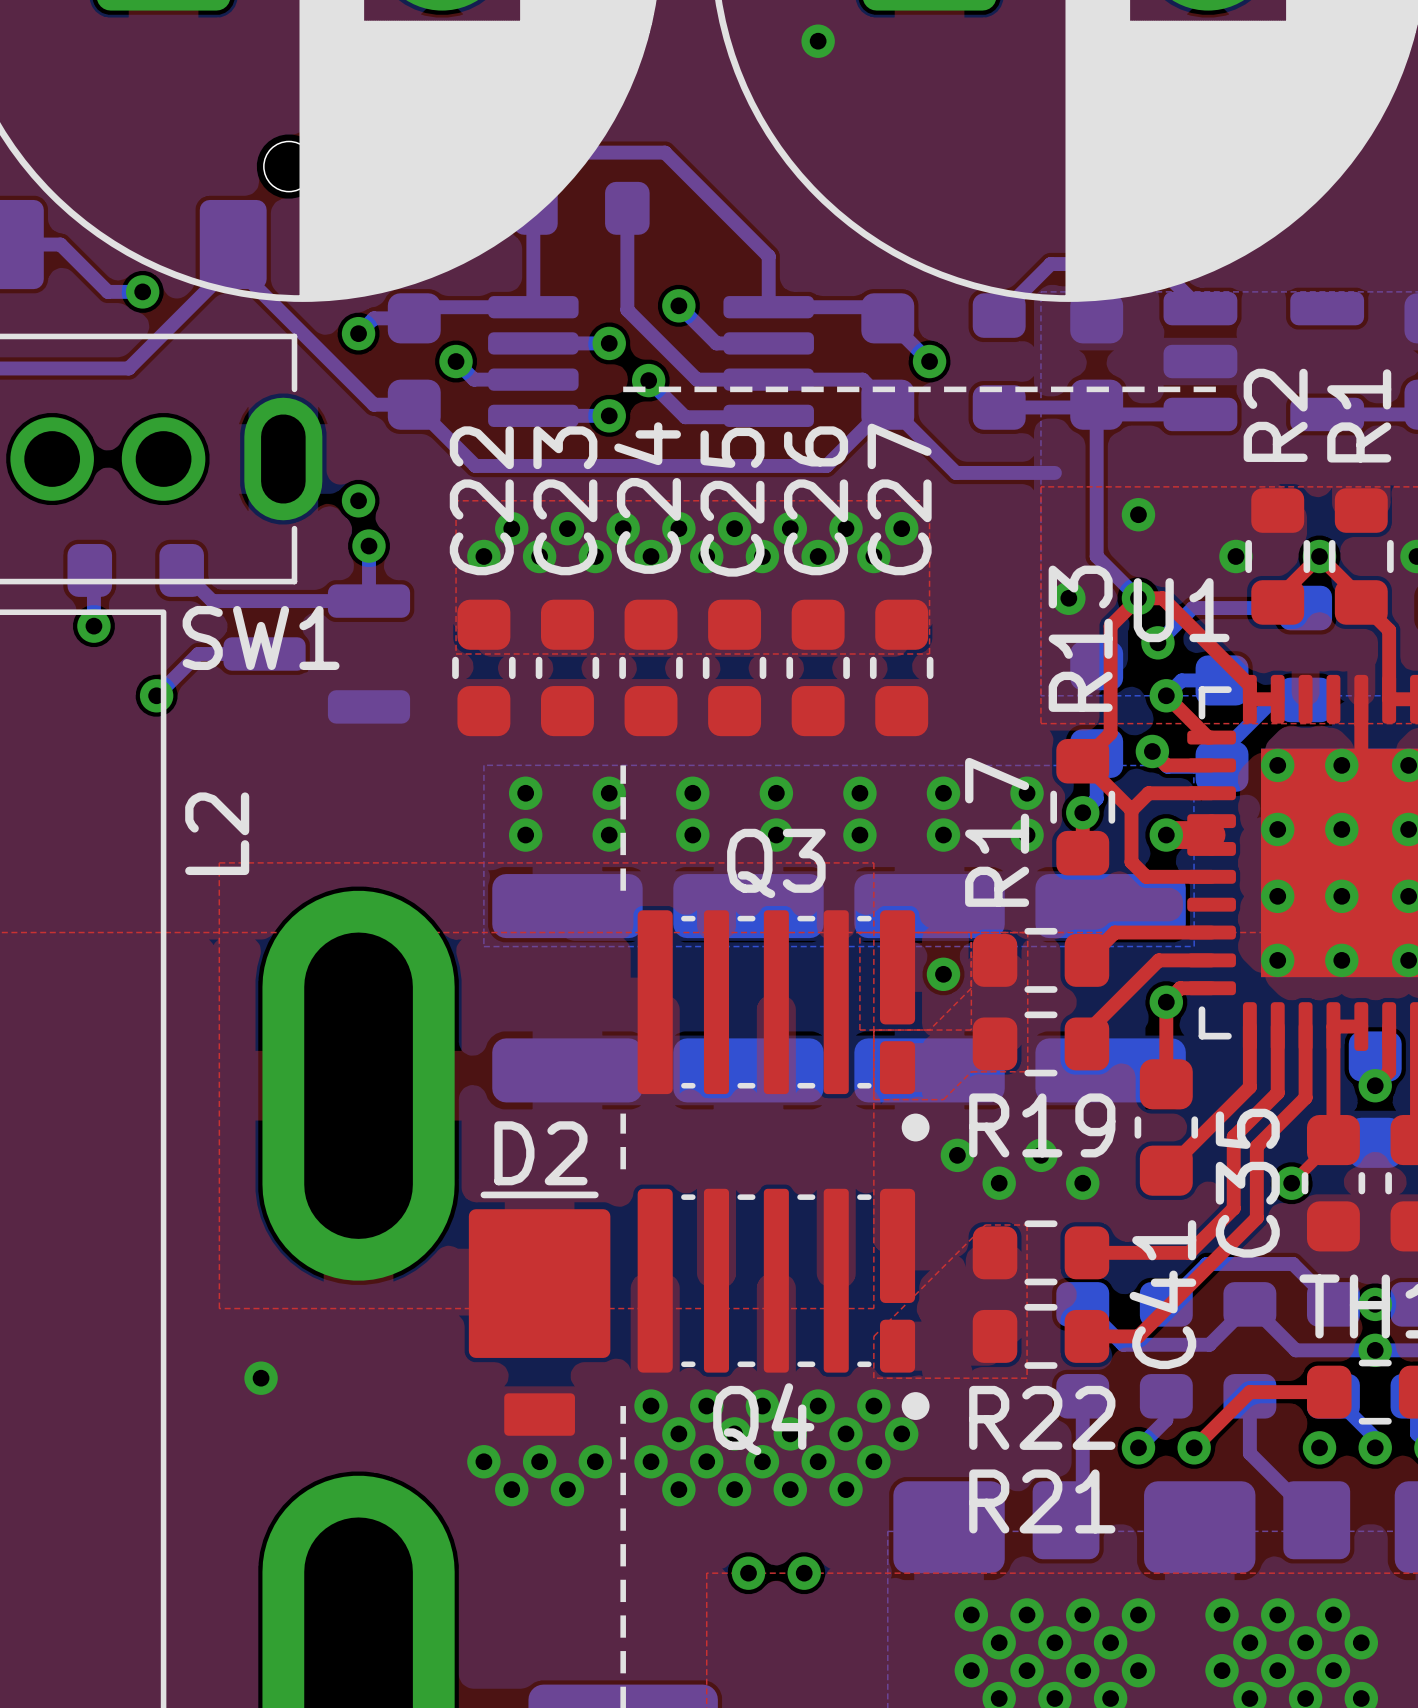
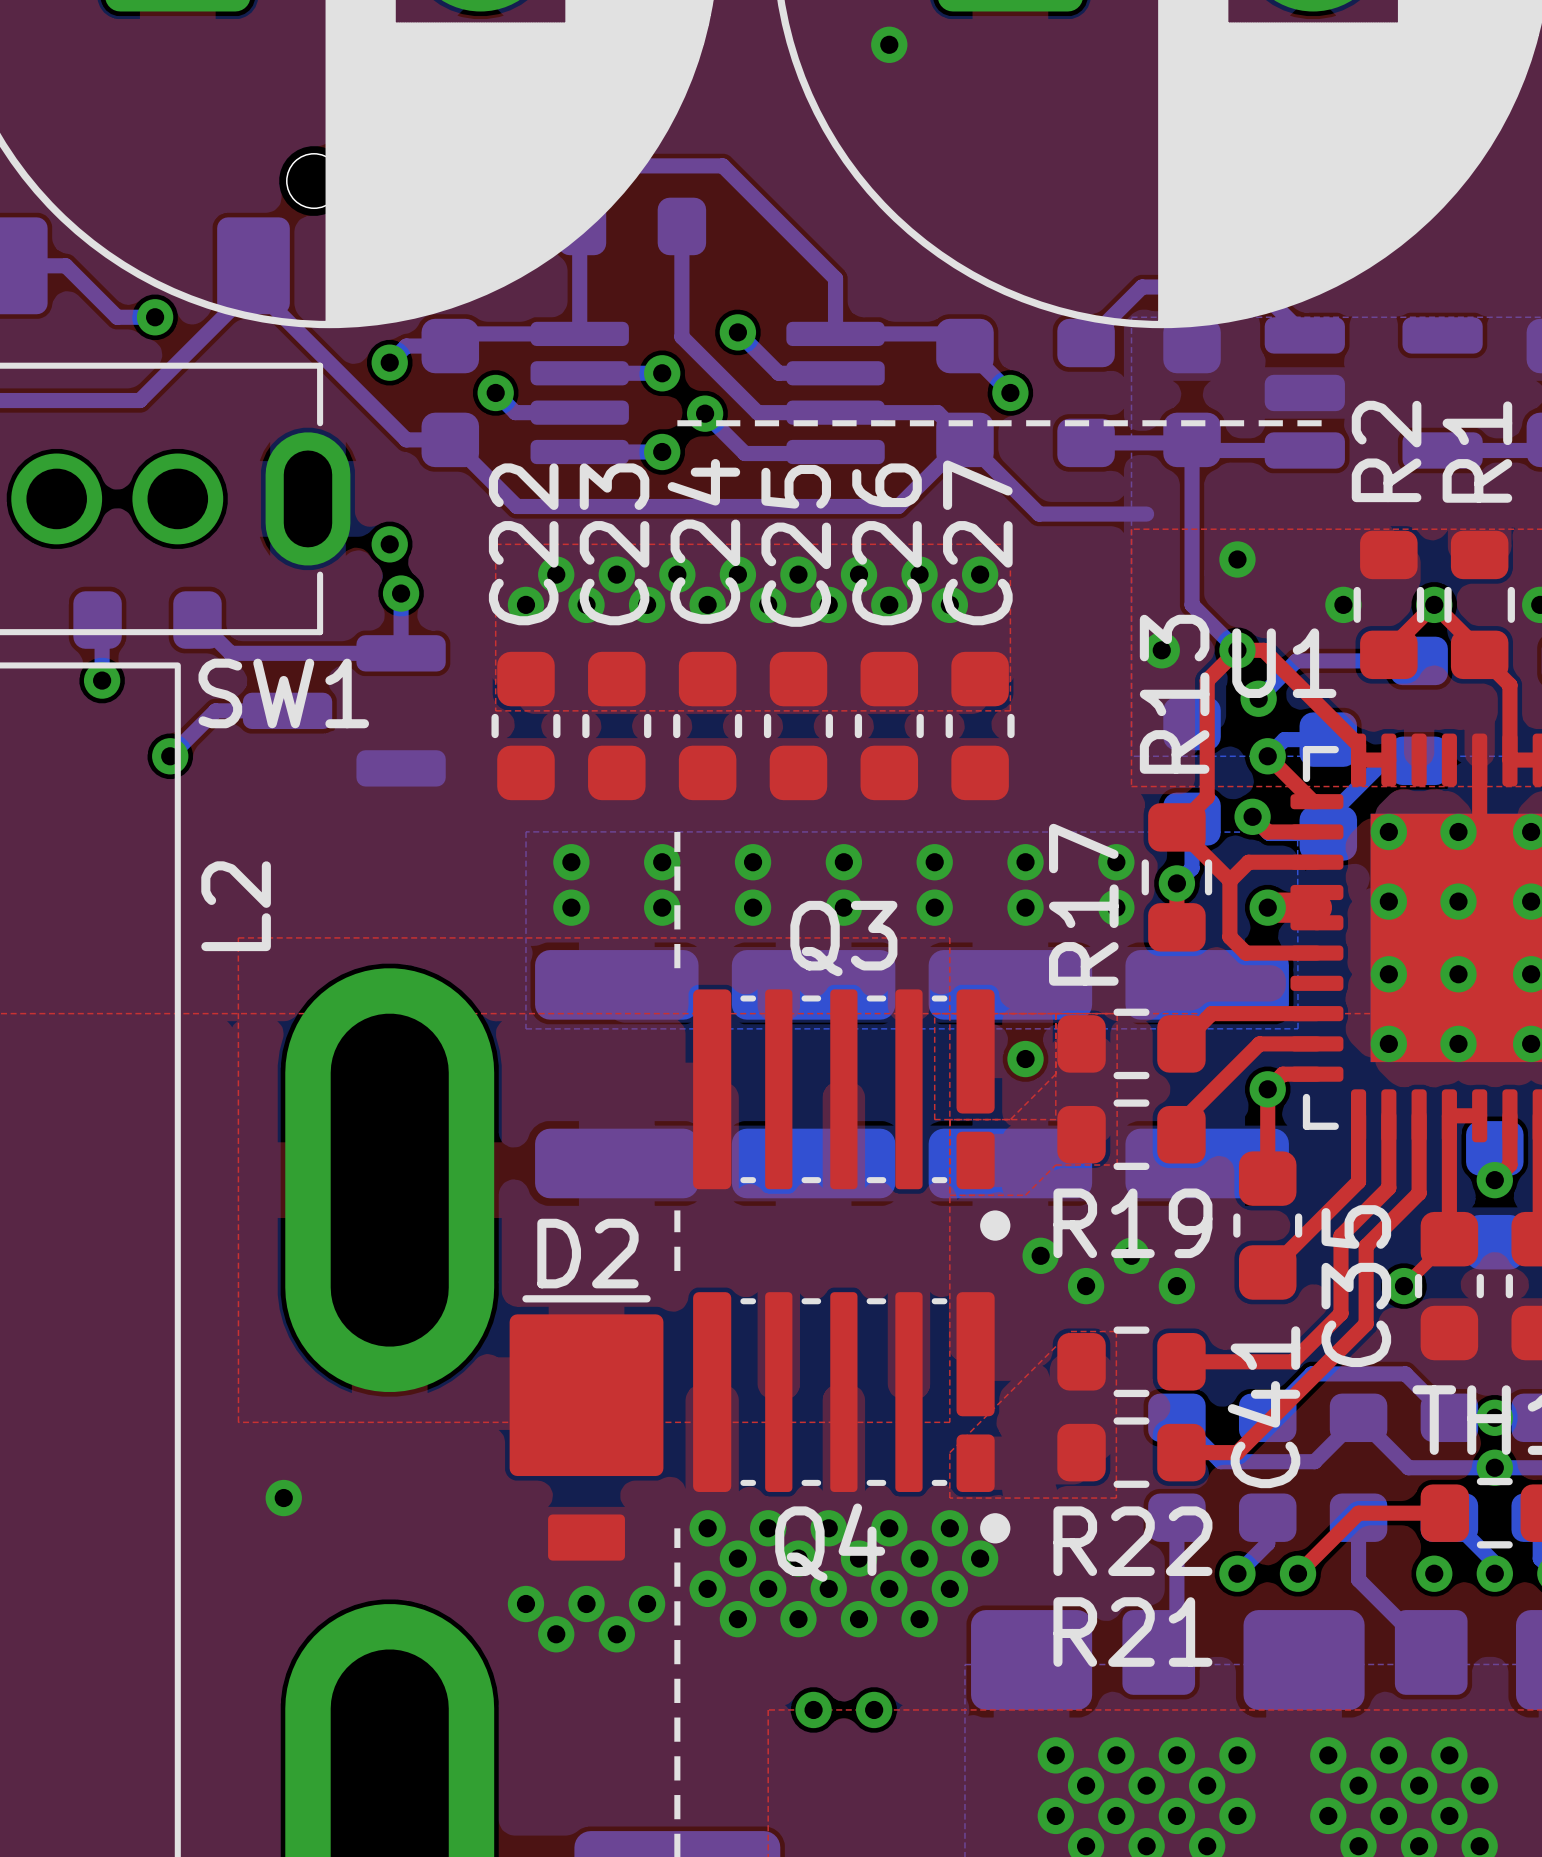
via position: (483, 1461) -> (525, 1604)
via position: (539, 1461) -> (586, 1604)
via position: (595, 1461) -> (647, 1604)
via position: (511, 1489) -> (556, 1634)
via position: (567, 1489) -> (616, 1634)

